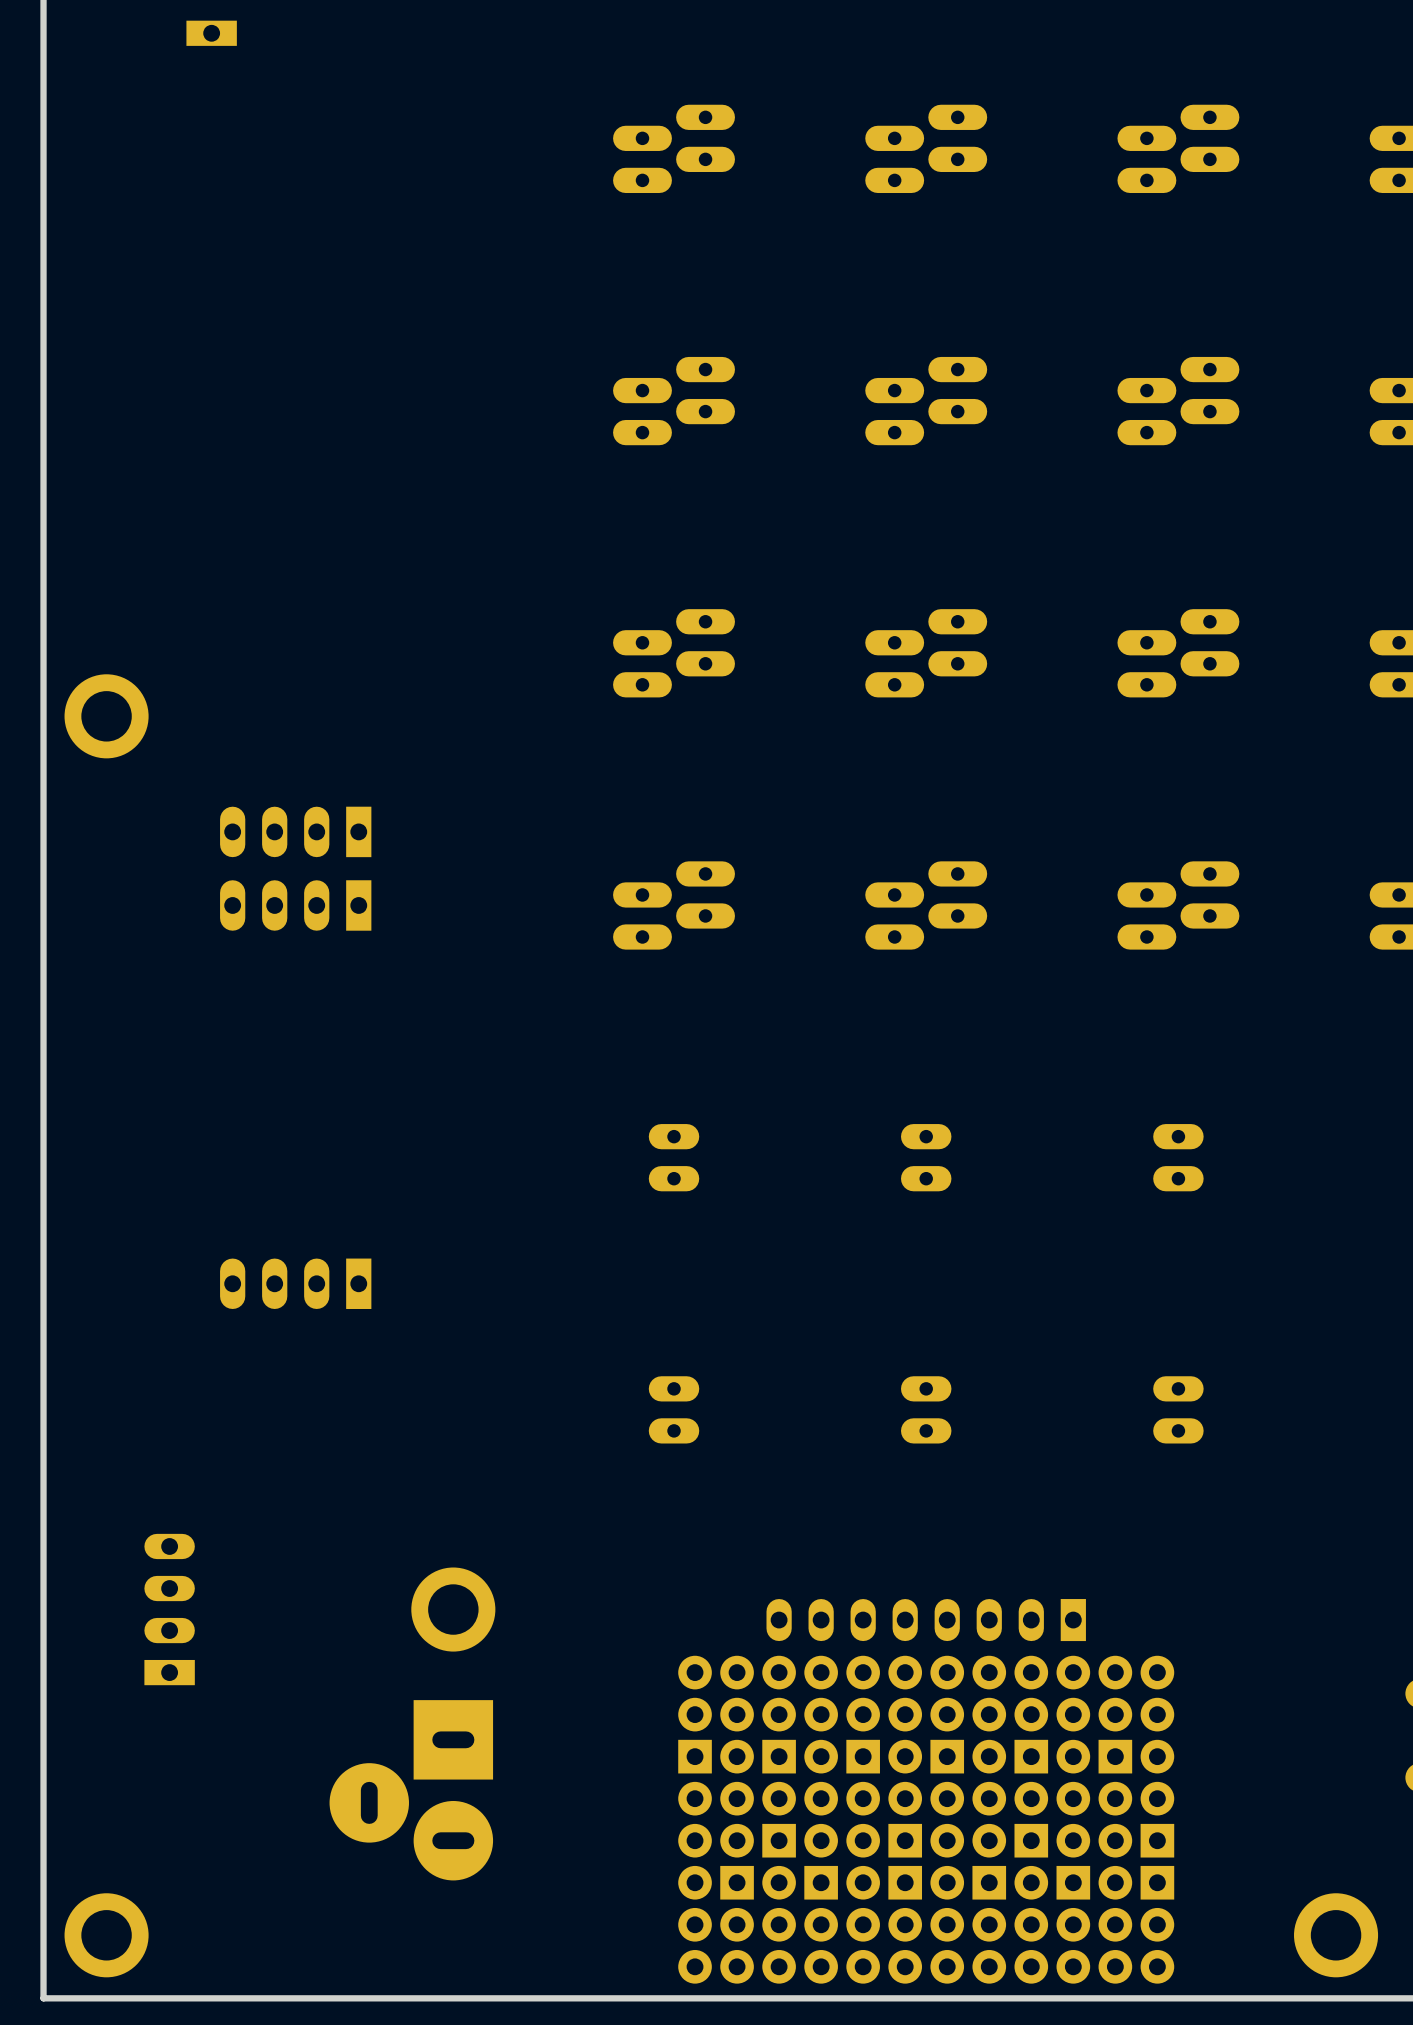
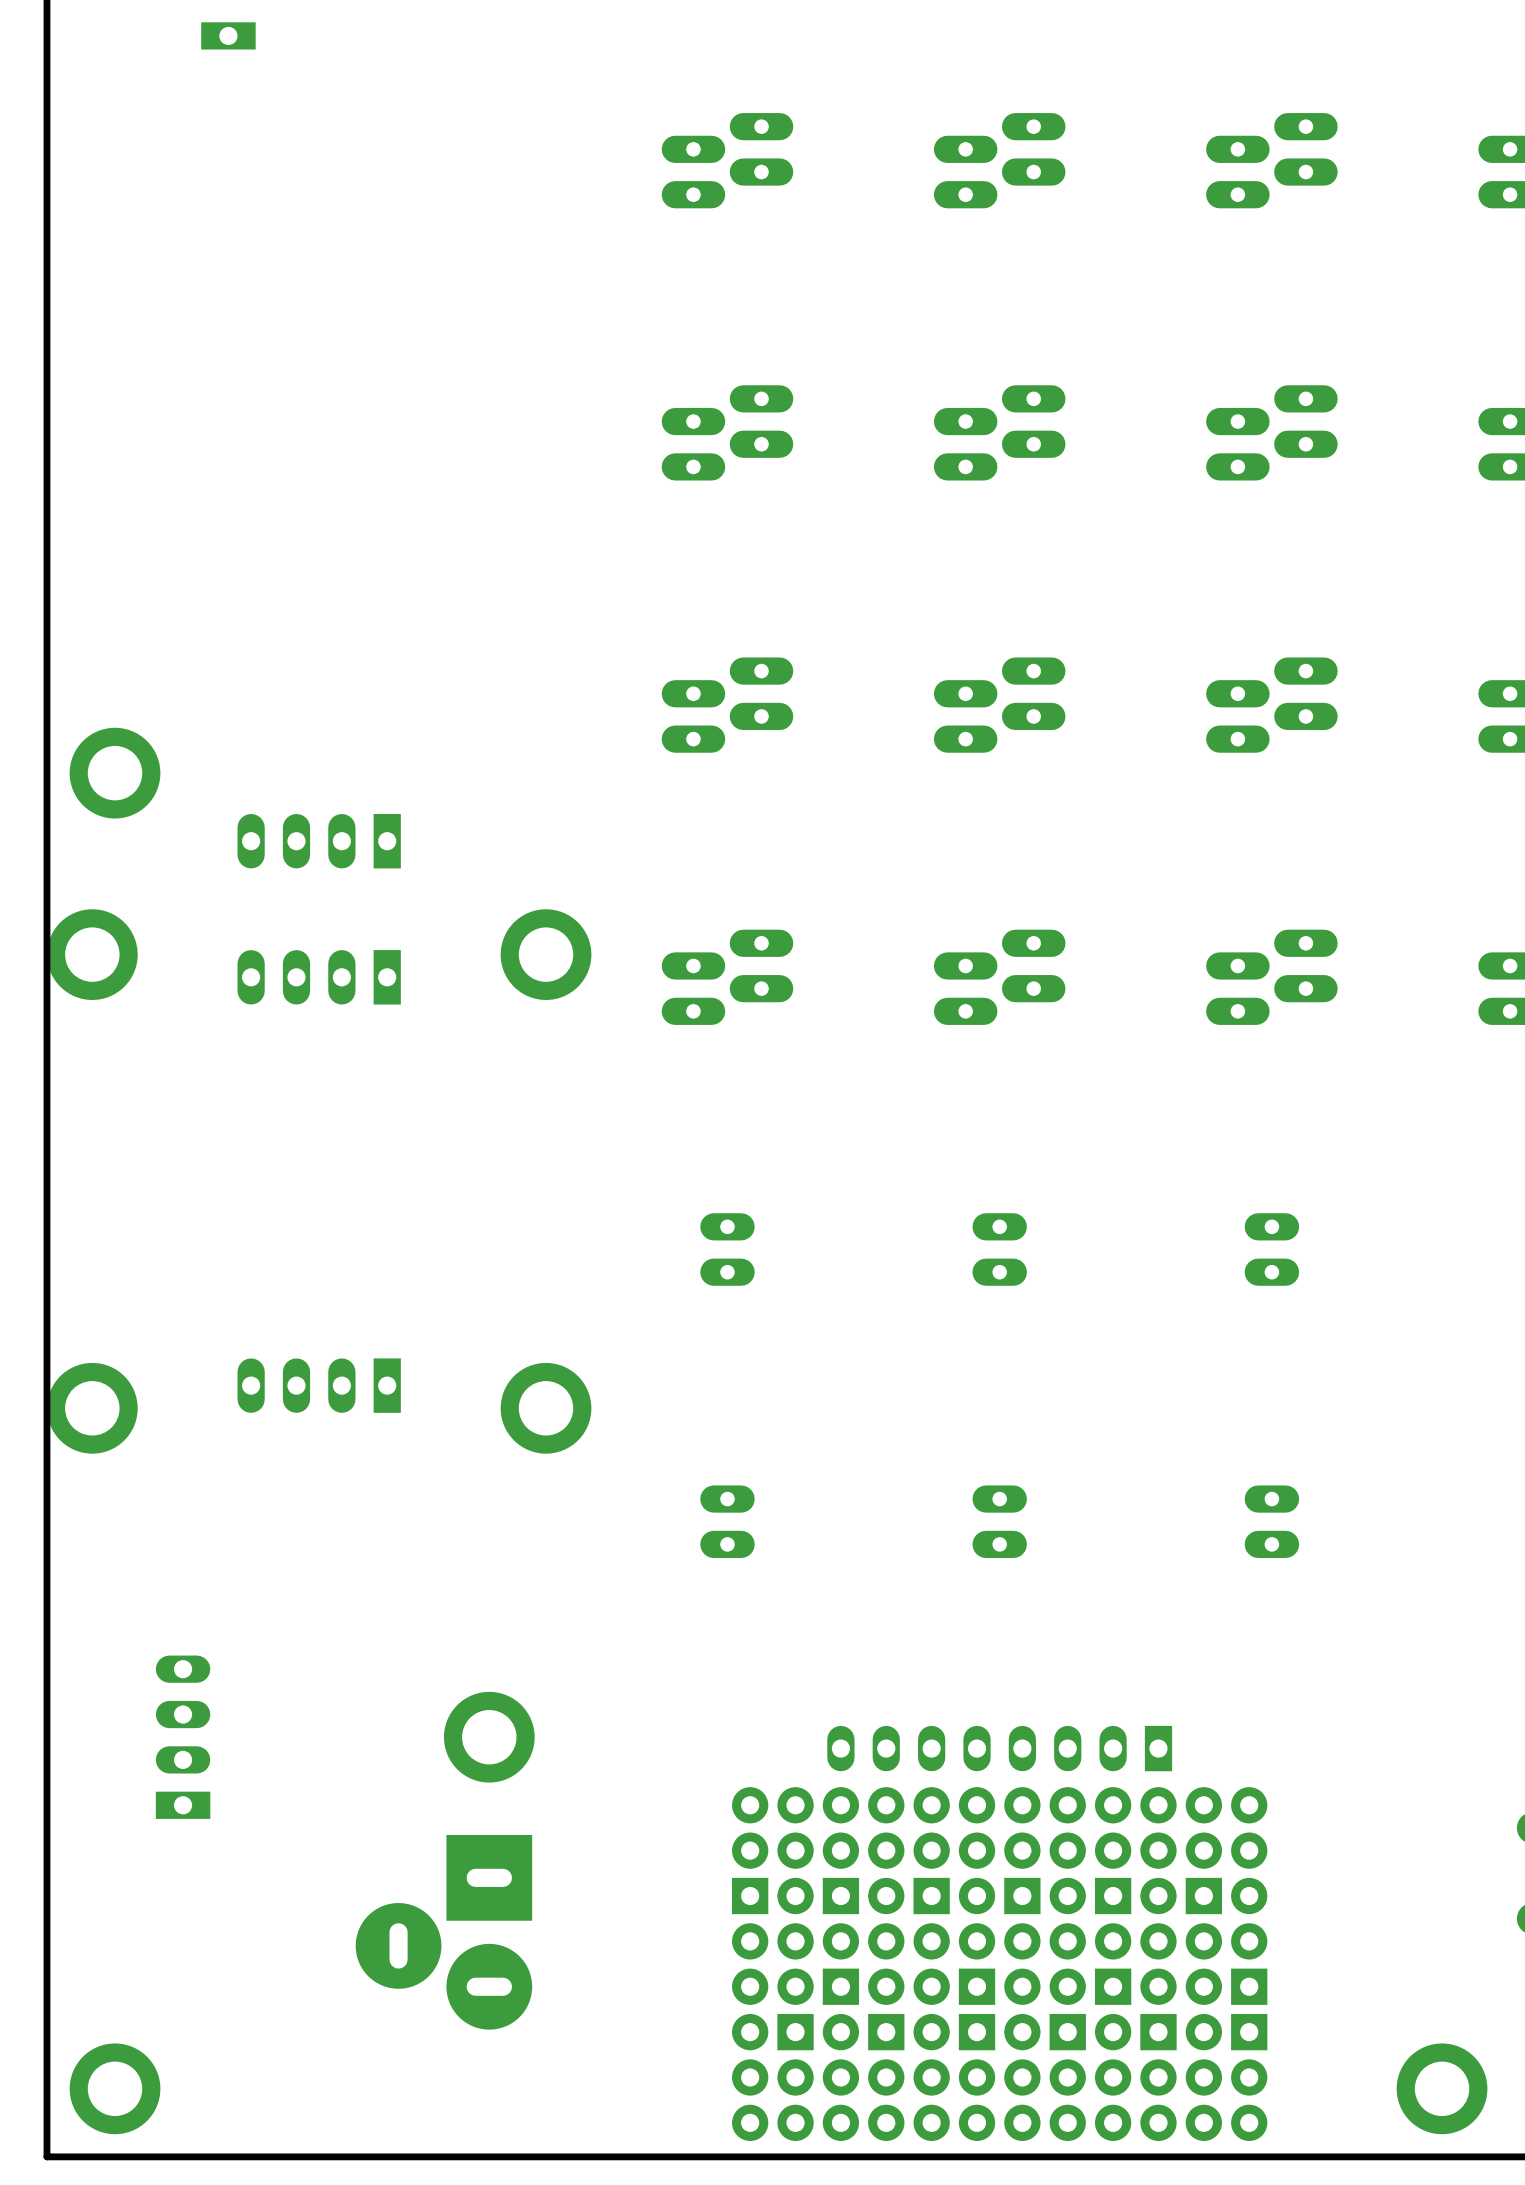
part position: (295, 831) -> (319, 841)
part: none -> (92, 954)
part: none -> (546, 954)
part: none -> (92, 1408)
part: none -> (546, 1408)

